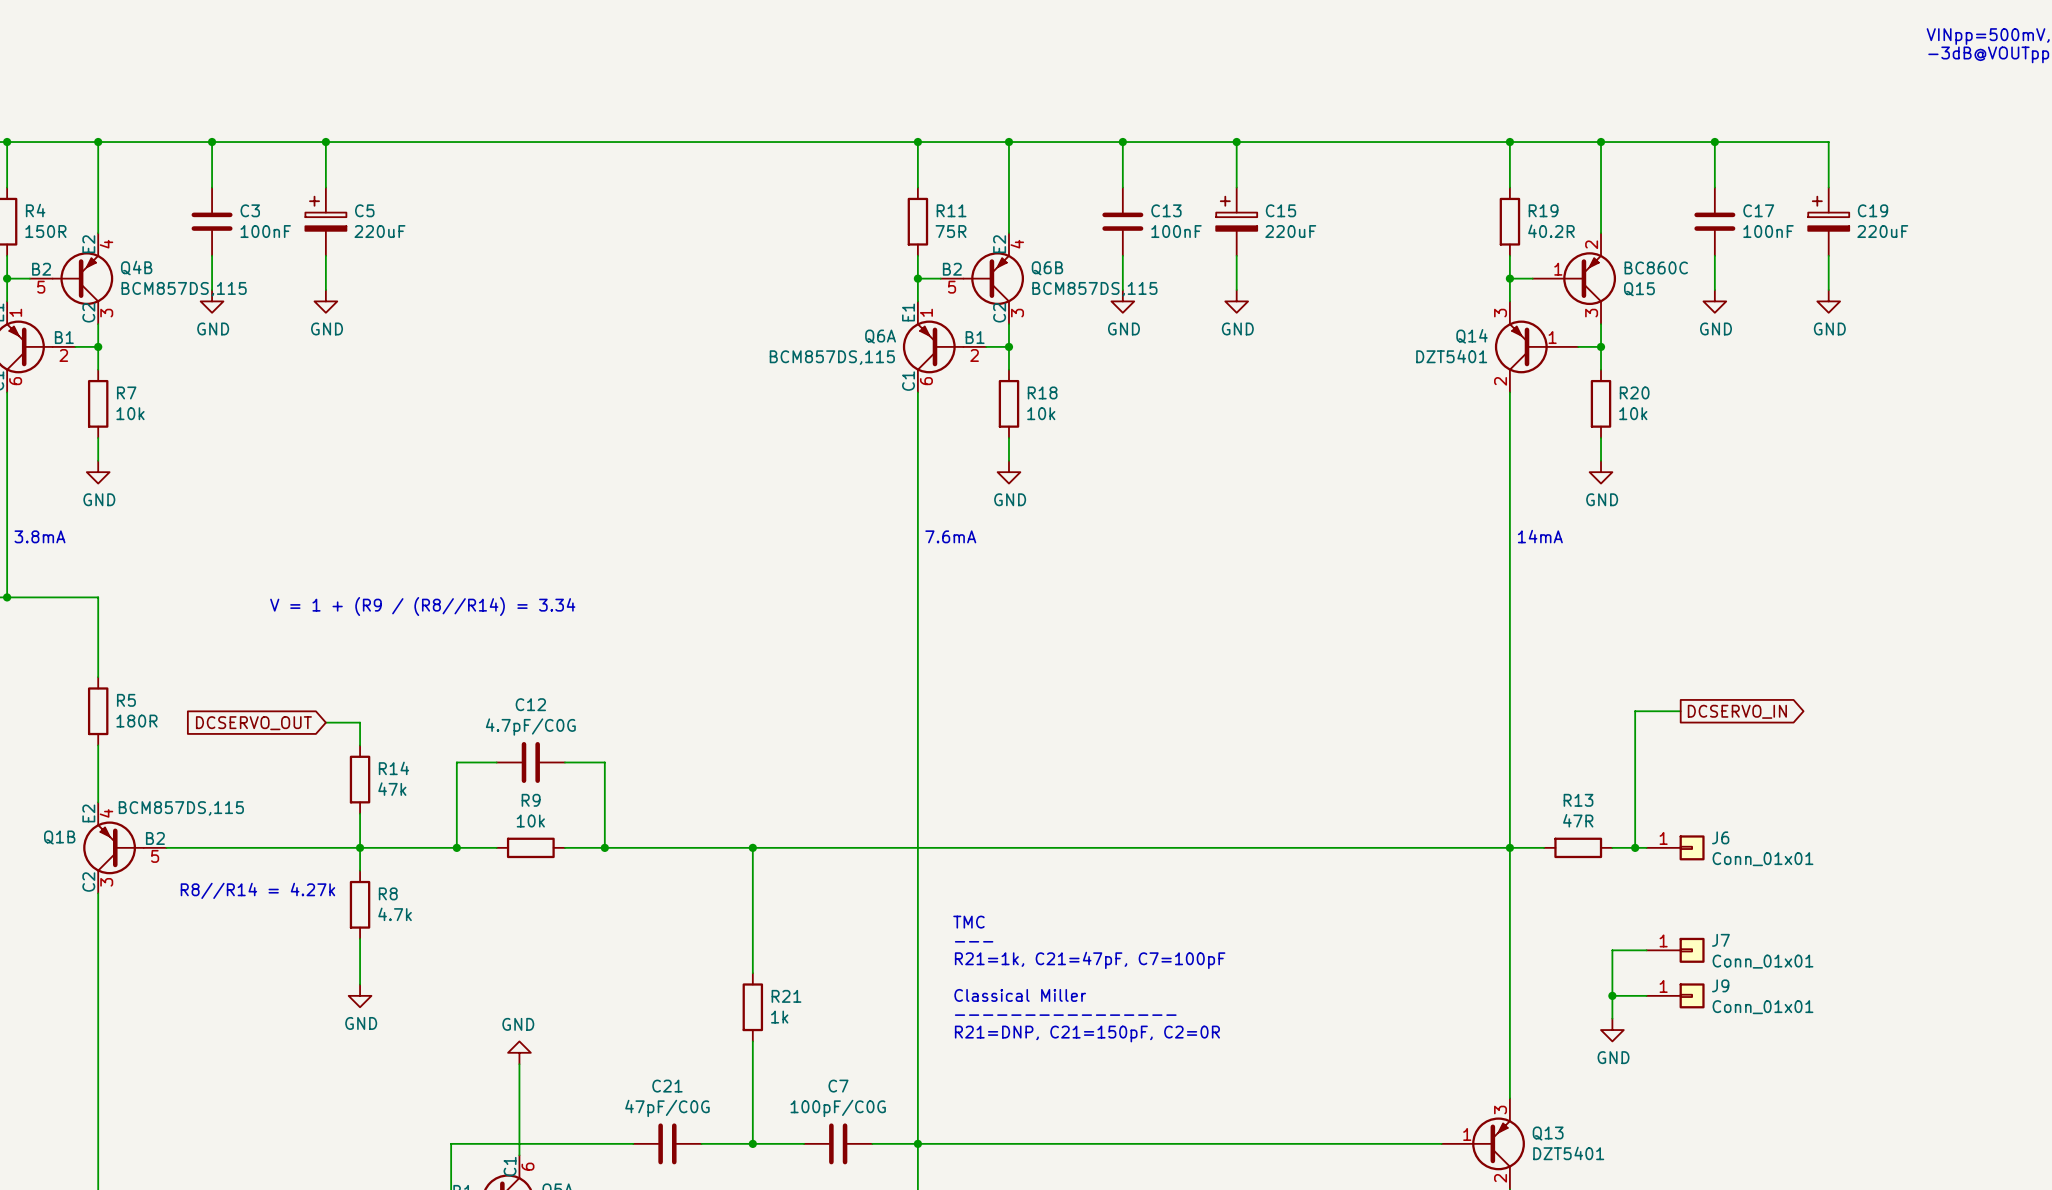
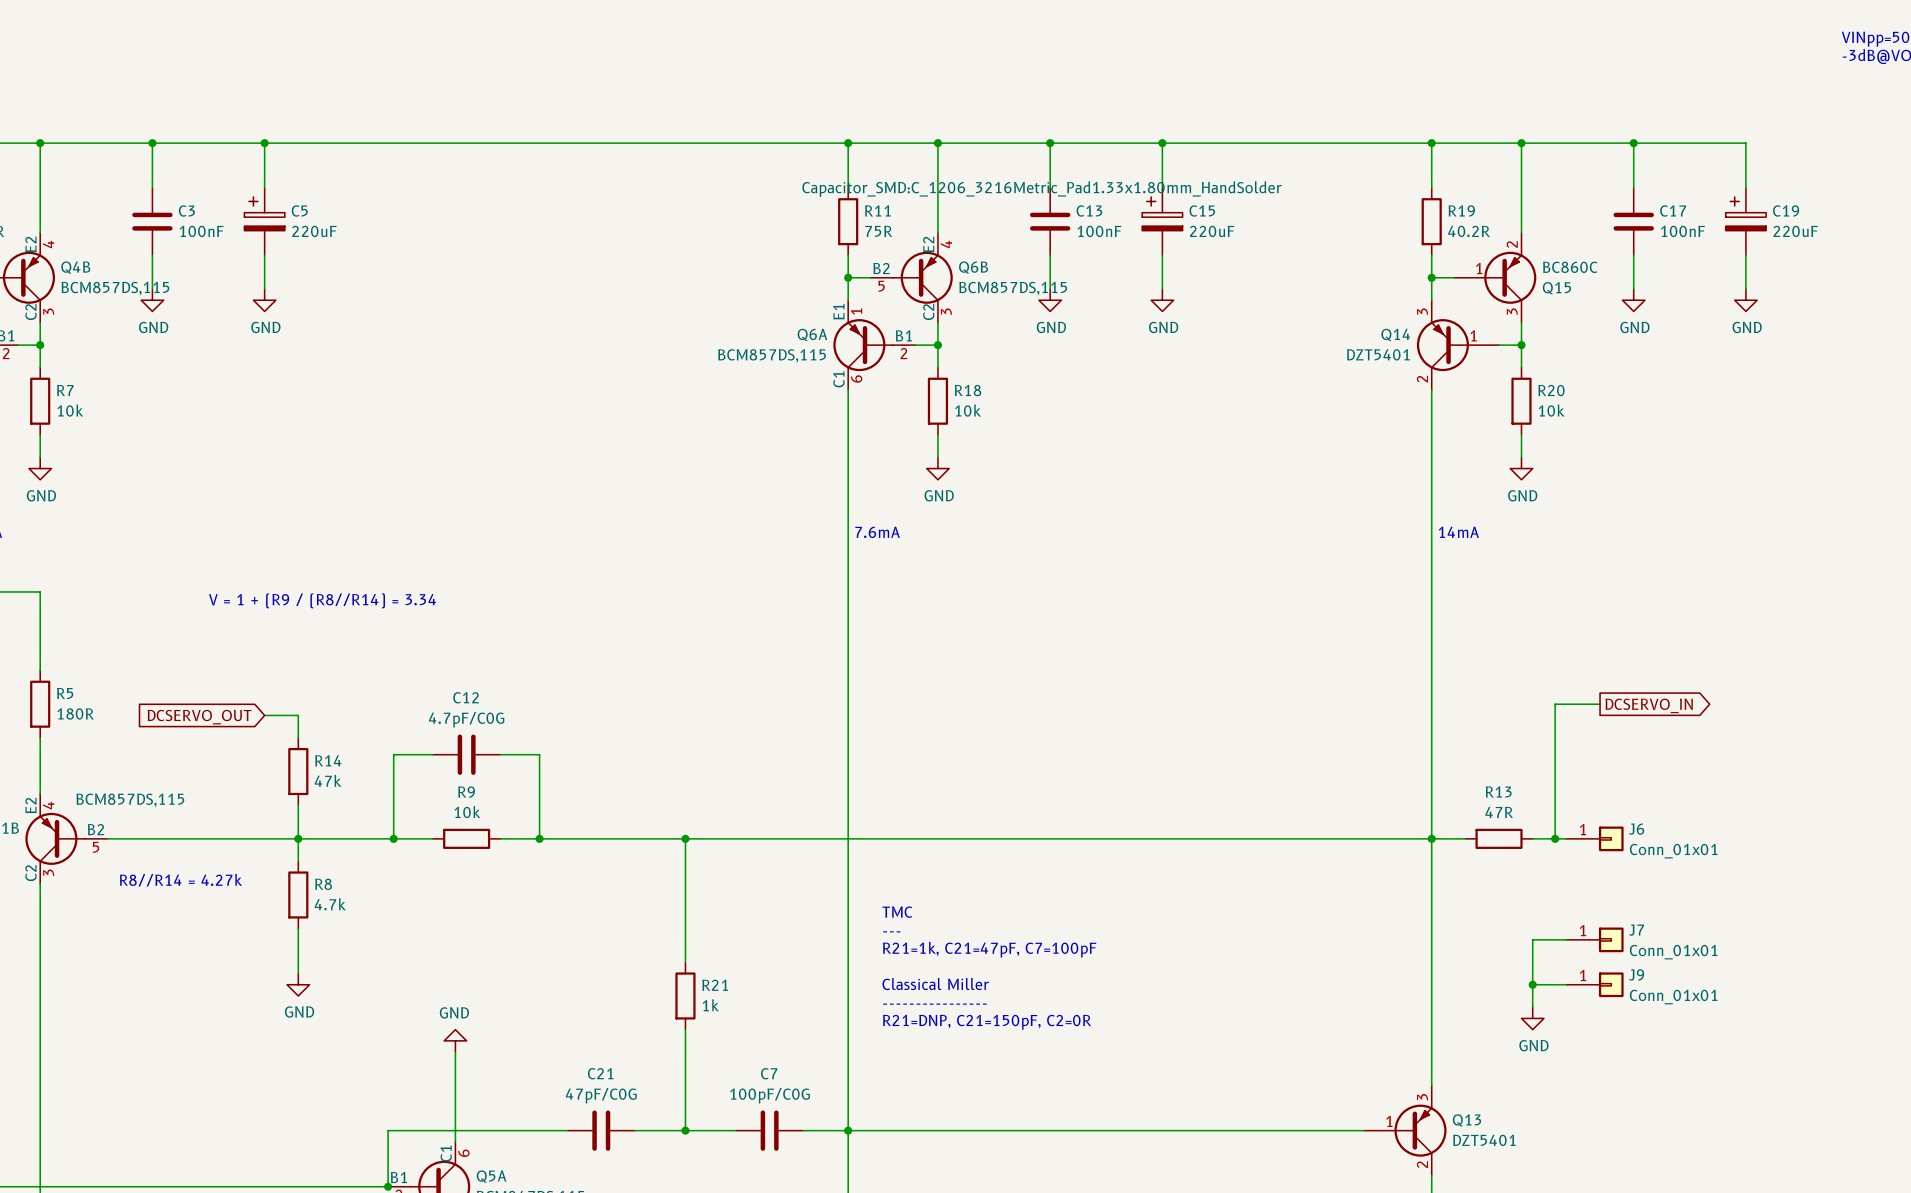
C13 text: none -> Capacitor_SMD:C_1206_3216Metric_Pad1.33x1.80mm_HandSolder (1041, 189)

